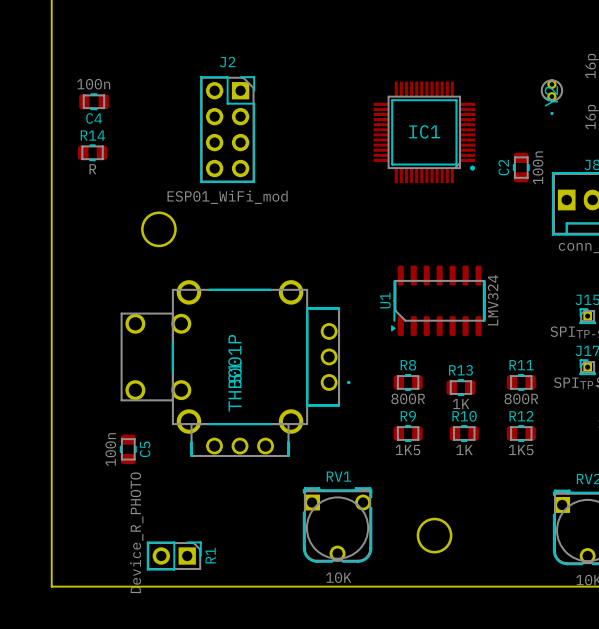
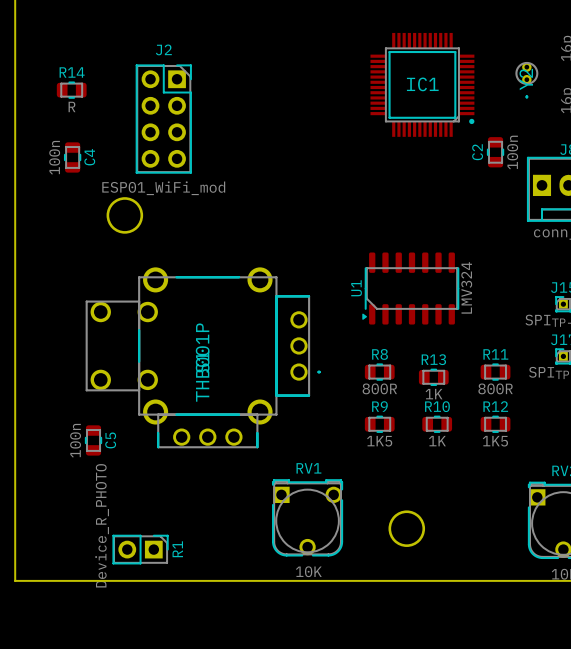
C4 value position: 100n (93, 84) -> 100n (54, 157)
C4 rotation: 0° (93, 101) -> 90° clockwise (72, 157)
C4 position: (93, 101) -> (72, 157)
C4 name position: C4 (94, 118) -> C4 (89, 157)
J2 position: (227, 129) -> (163, 119)
IC1 position: (424, 132) -> (422, 84)
R14 position: (92, 152) -> (71, 90)

